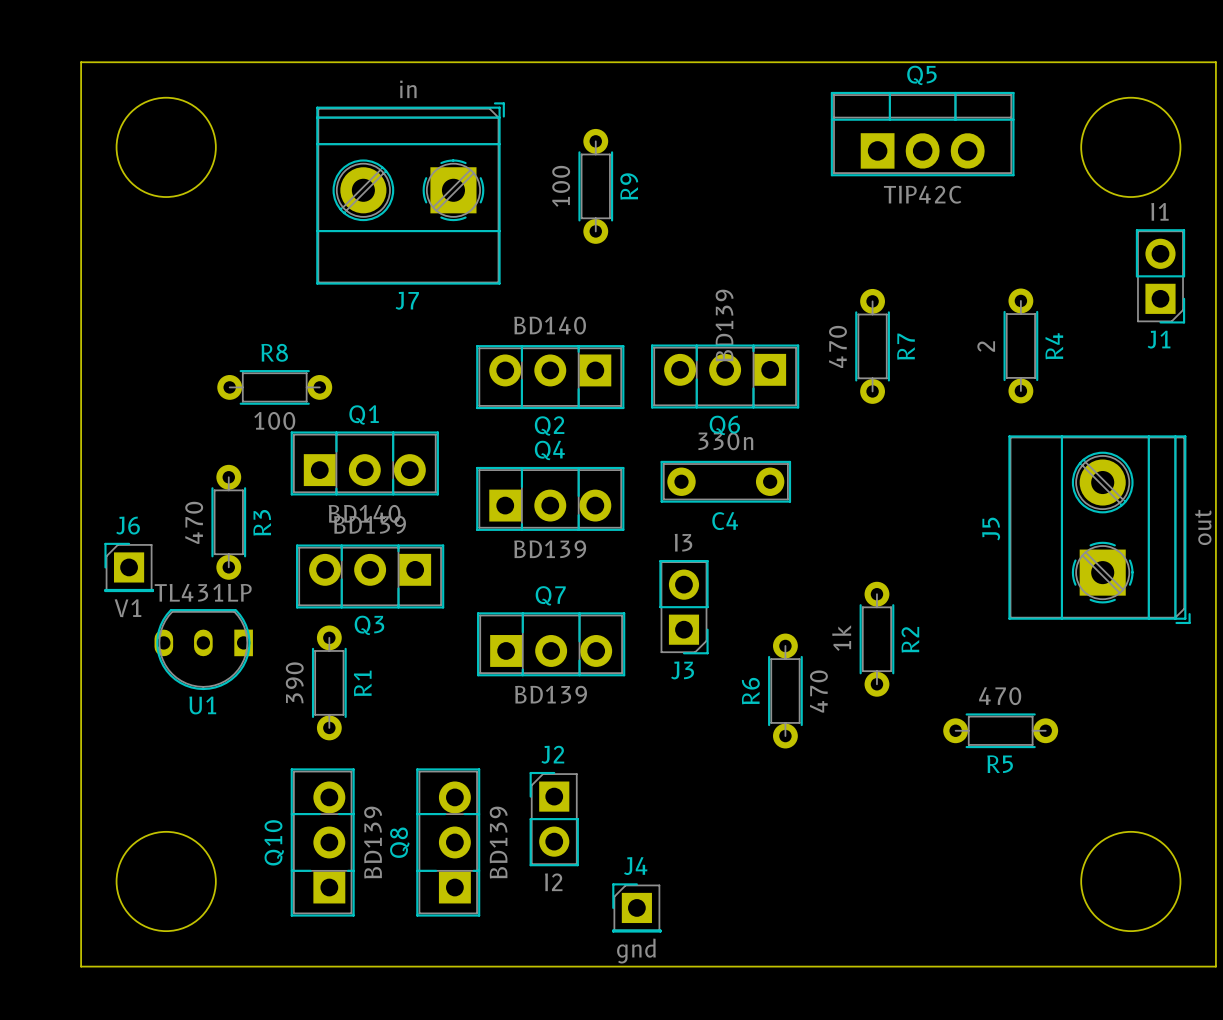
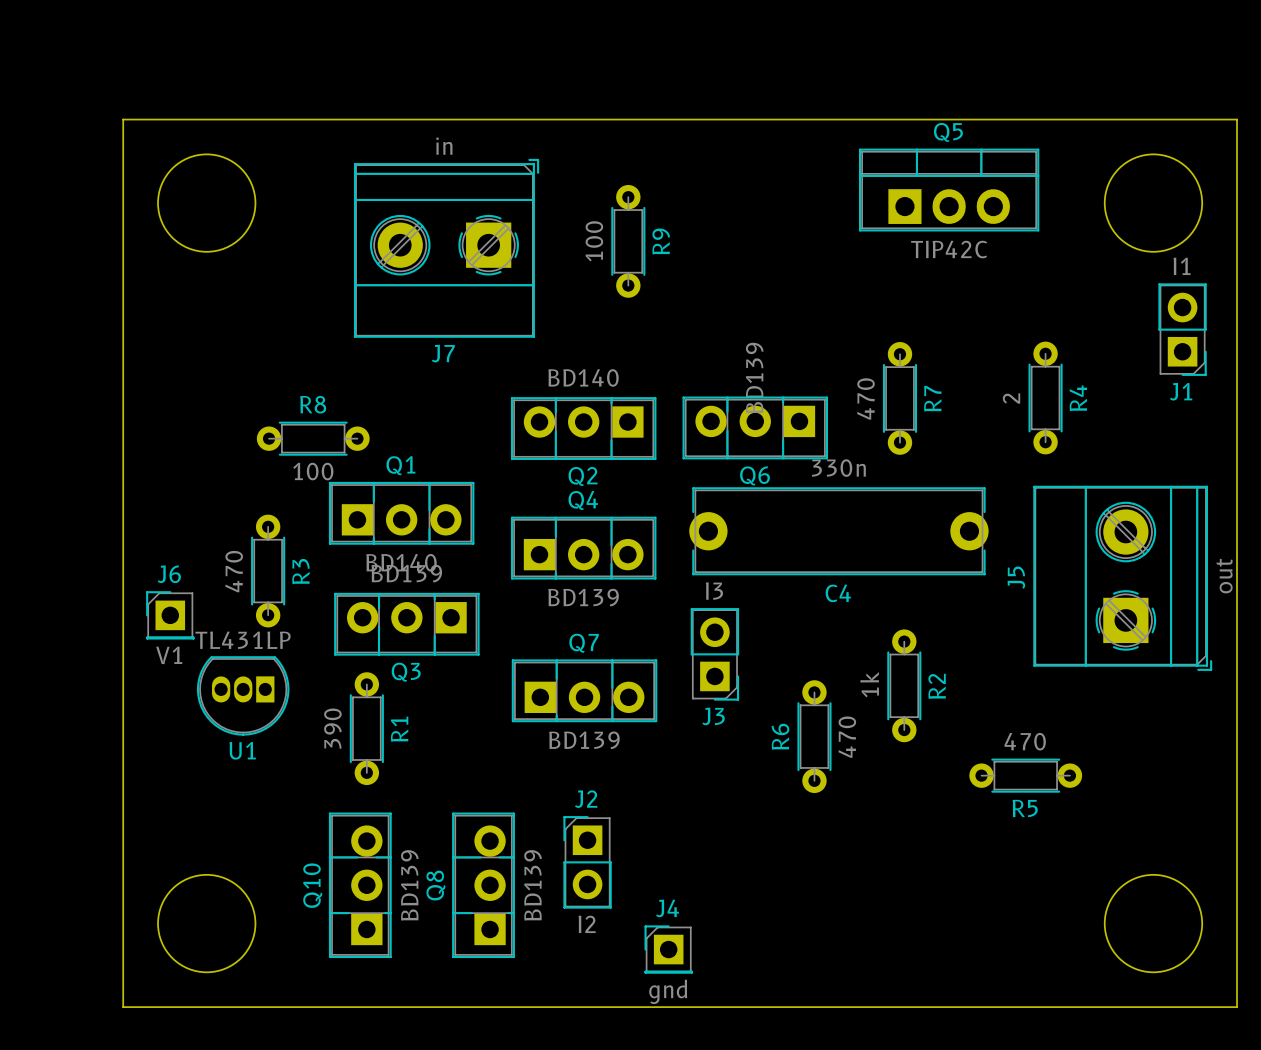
C4 footprint: [660, 460, 792, 503] -> [689, 487, 989, 576]
U1 footprint: [154, 609, 253, 691] -> [196, 656, 290, 736]

